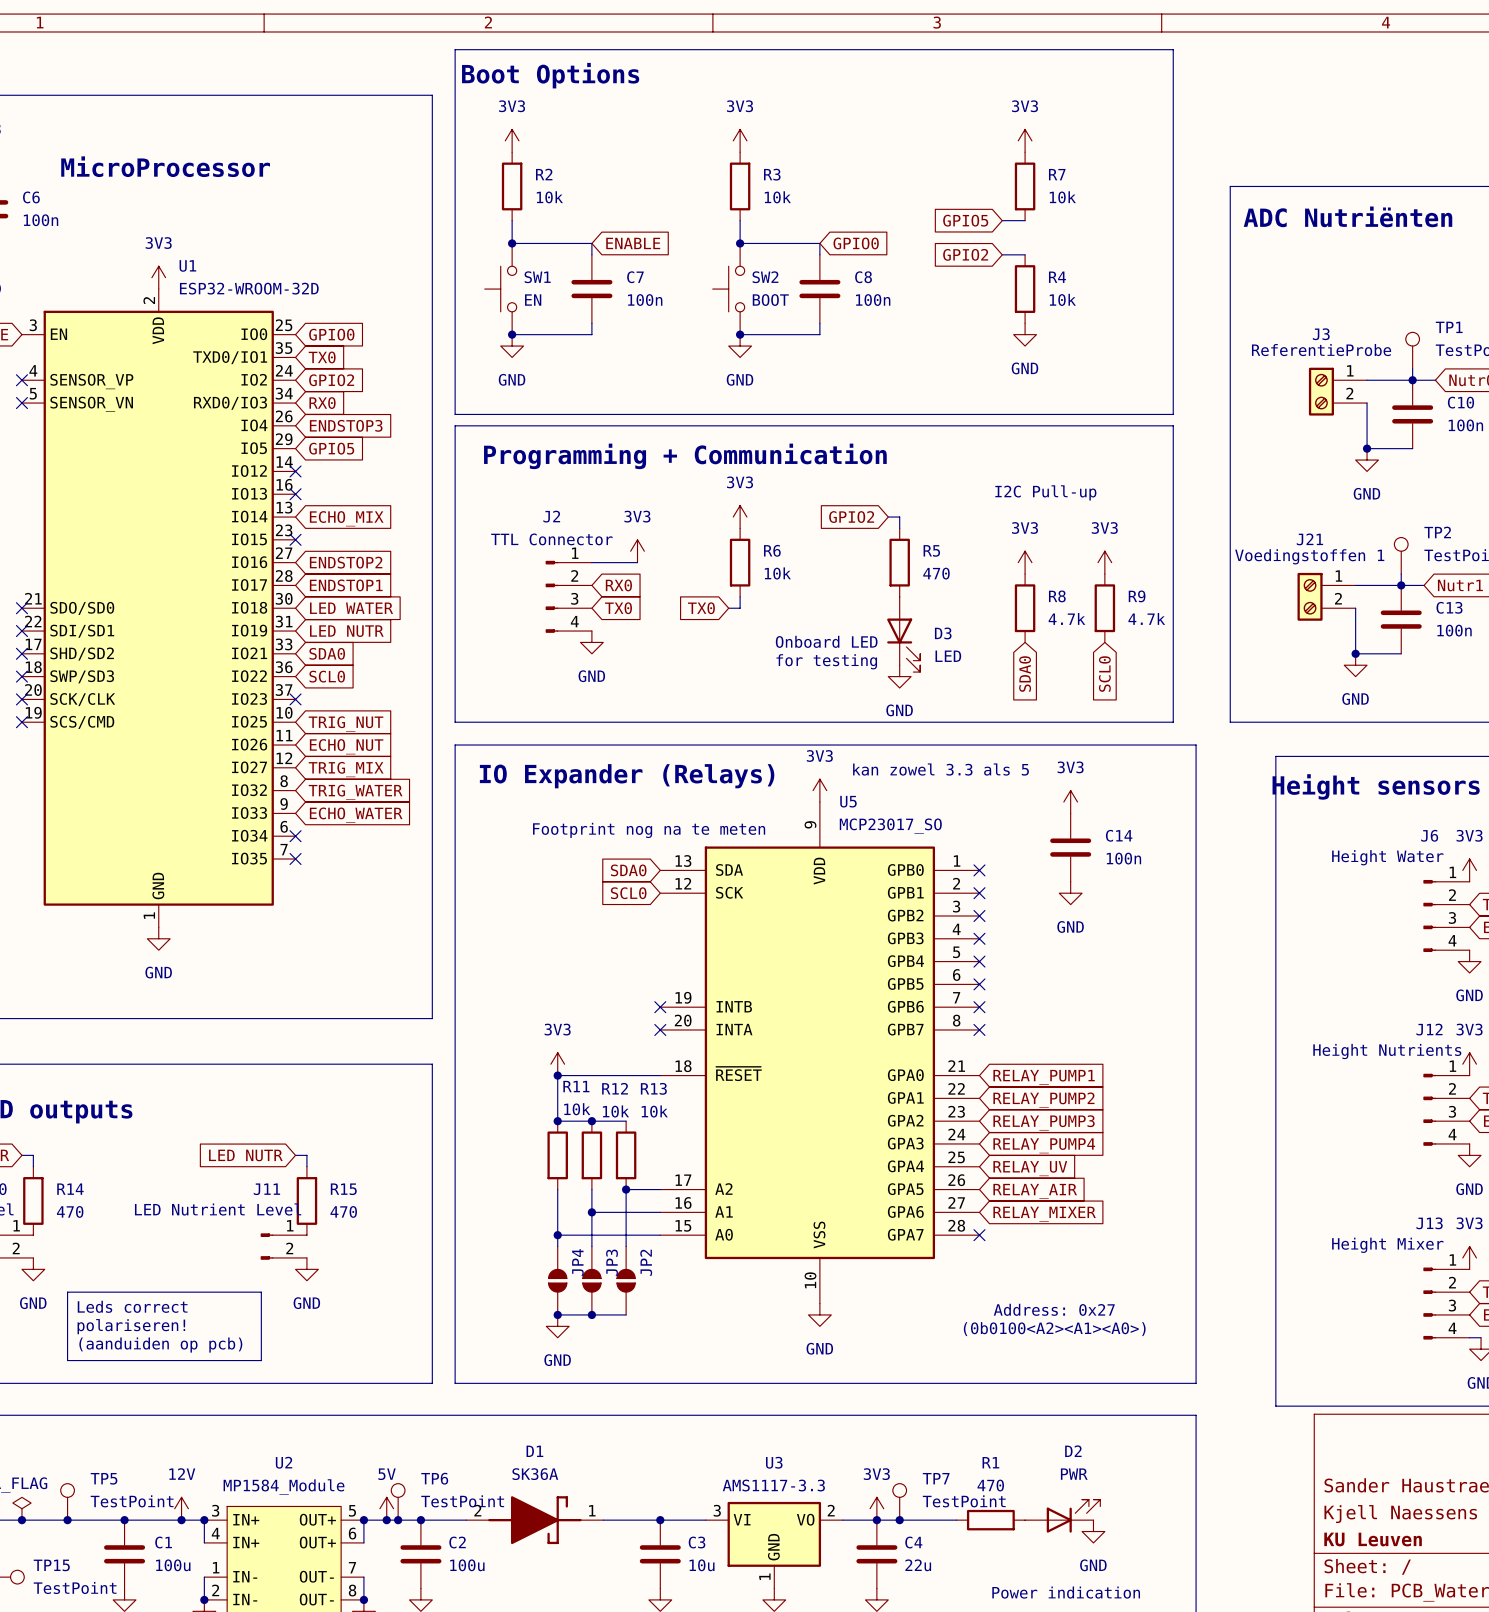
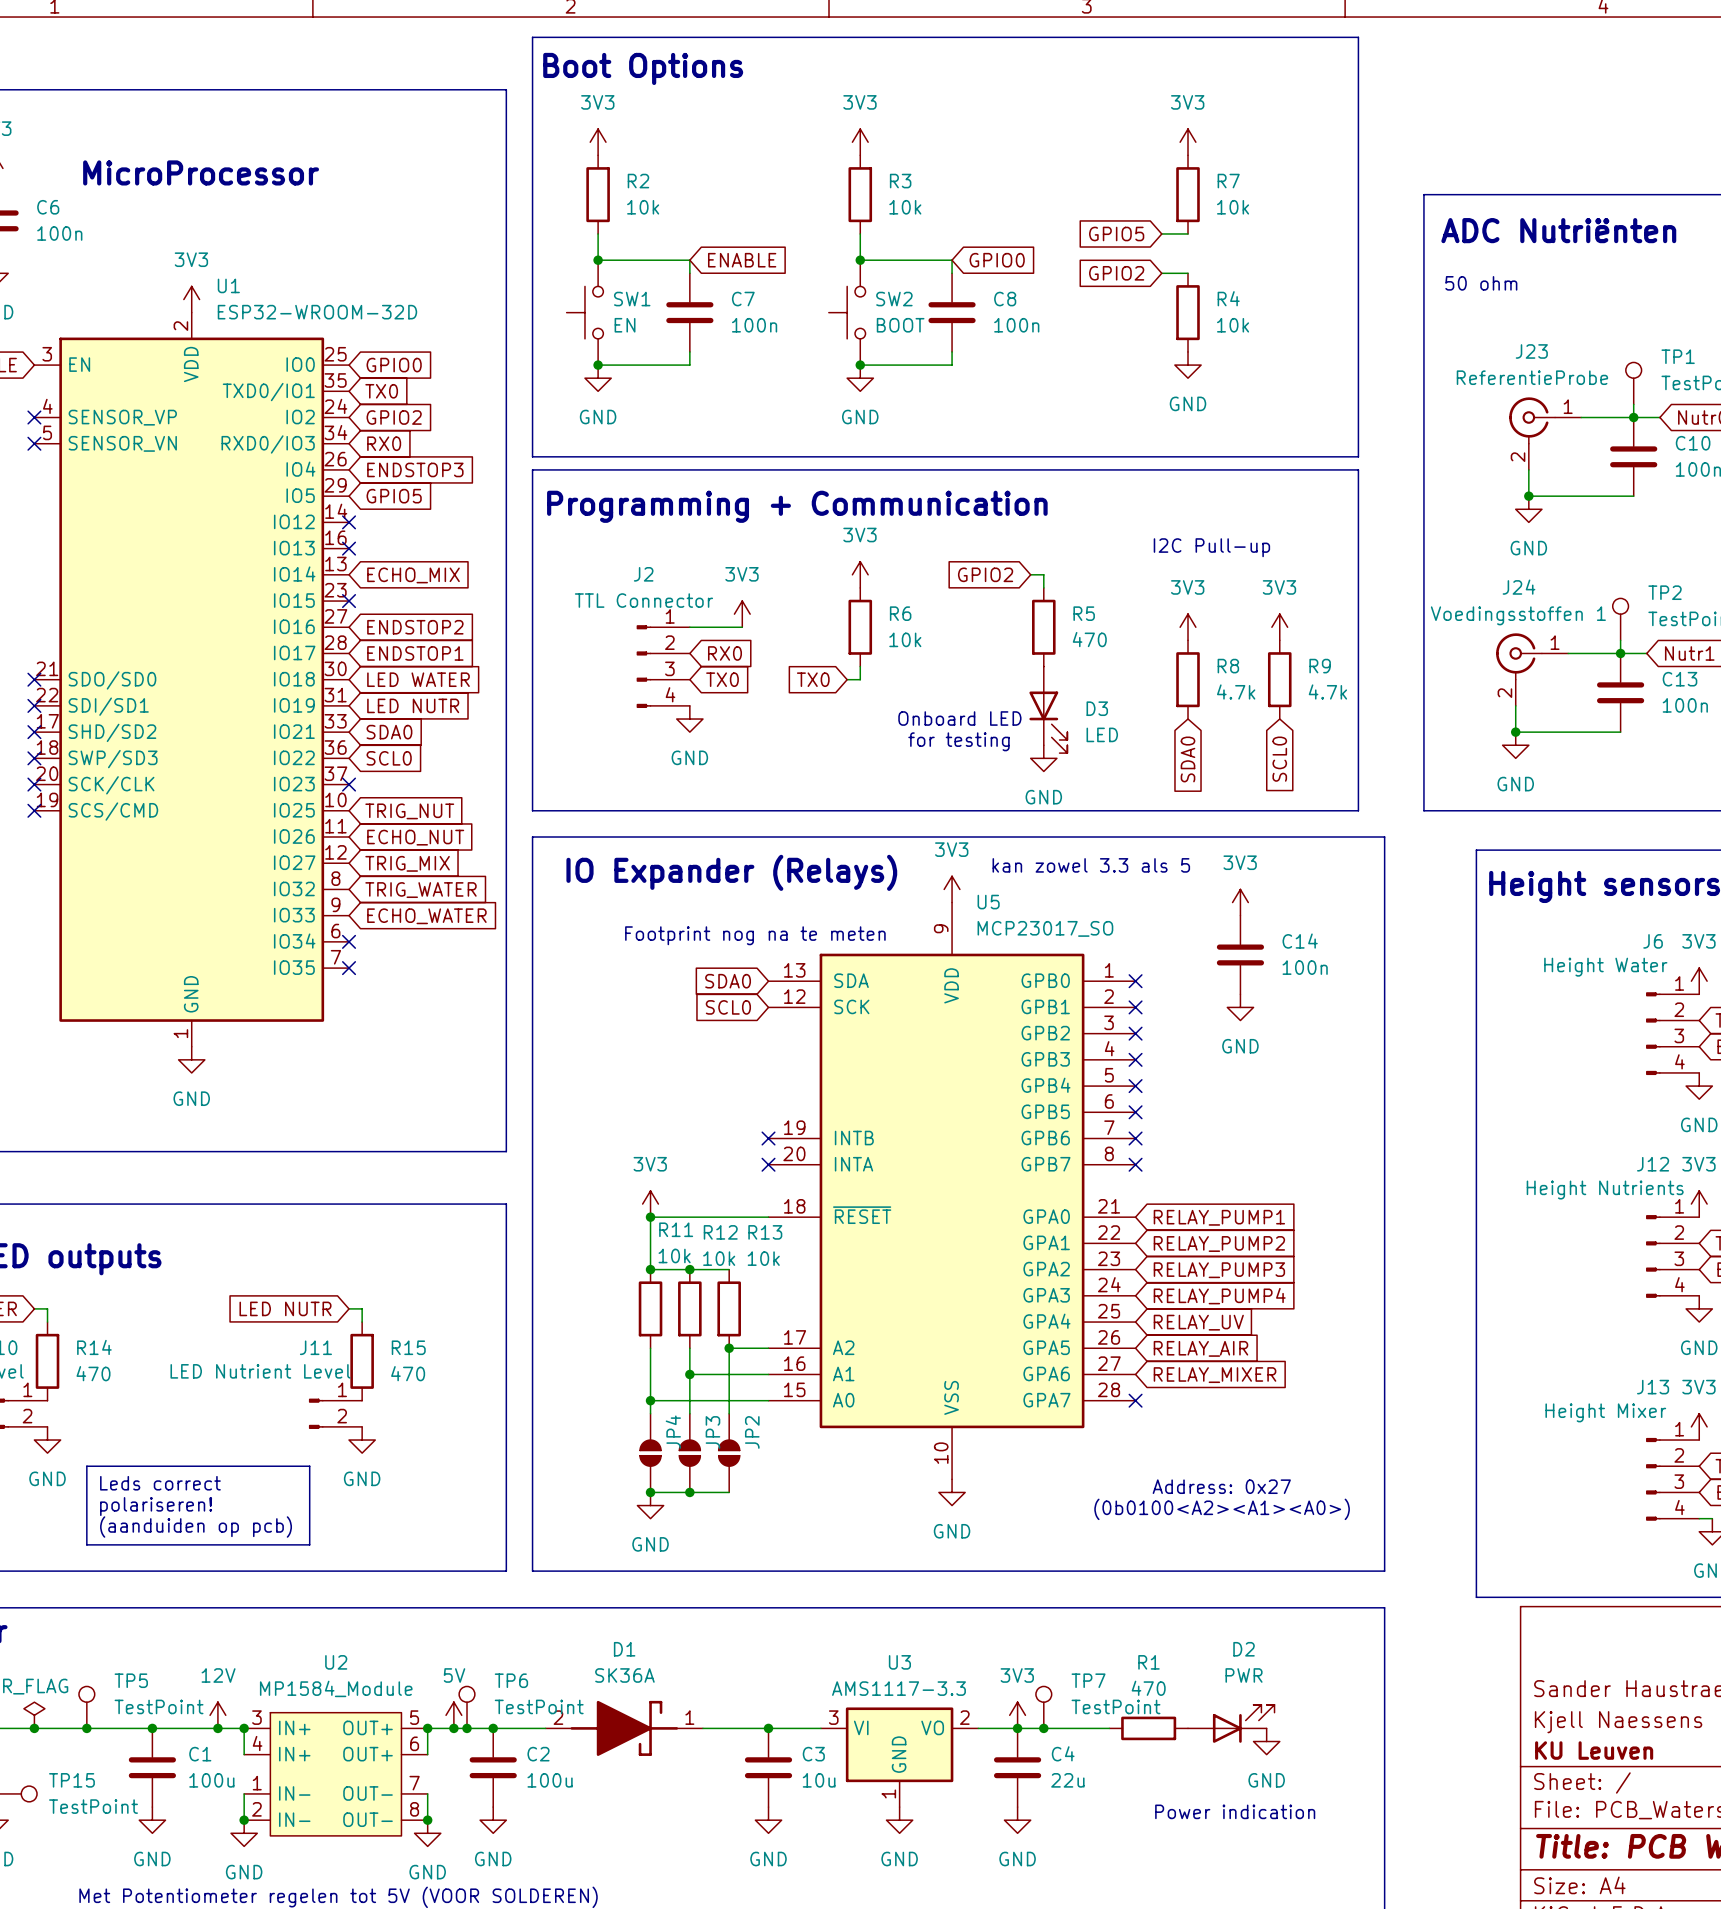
text: none -> 50 ohm (1481, 283)
J3: ReferentieProbe (1337, 391) -> none
J23: none -> ReferentieProbe (1545, 433)
wire: (1367, 403) (1367, 448) -> (1528, 469) (1528, 496) (1581, 496)
junction position: (1367, 448) -> (1528, 496)
power symbol position: GND (1367, 460) -> GND (1528, 509)
J21: Voedingstoffen 1 (1326, 596) -> none
J24: none -> Voedingsstoffen 1 (1532, 669)
wire: (1355, 608) (1355, 653) -> (1515, 705) (1515, 732) (1568, 732)
junction position: (1355, 653) -> (1515, 732)
power symbol position: GND (1355, 665) -> GND (1515, 745)

